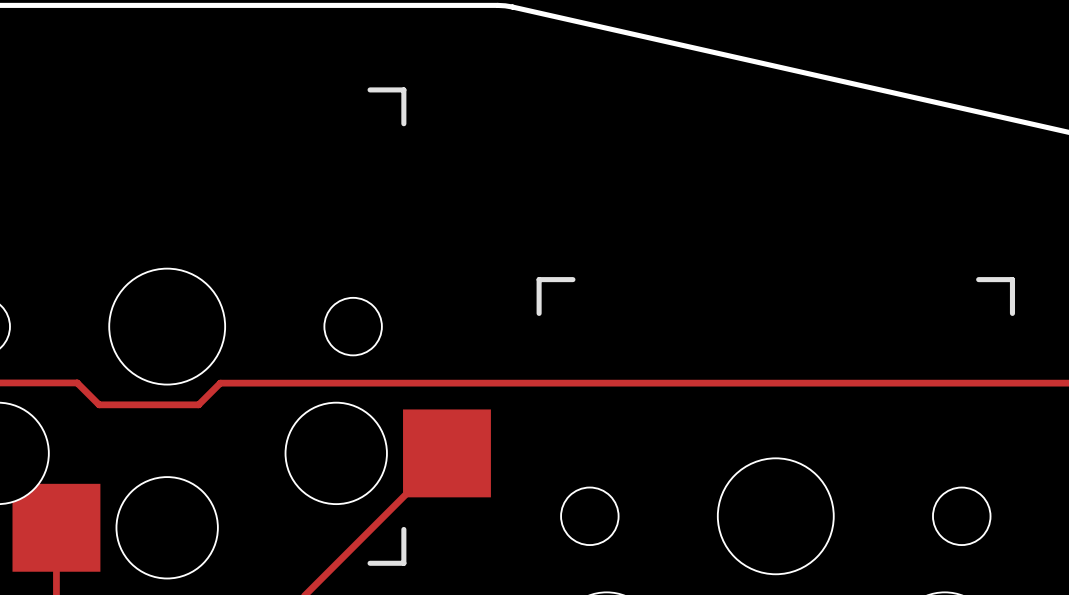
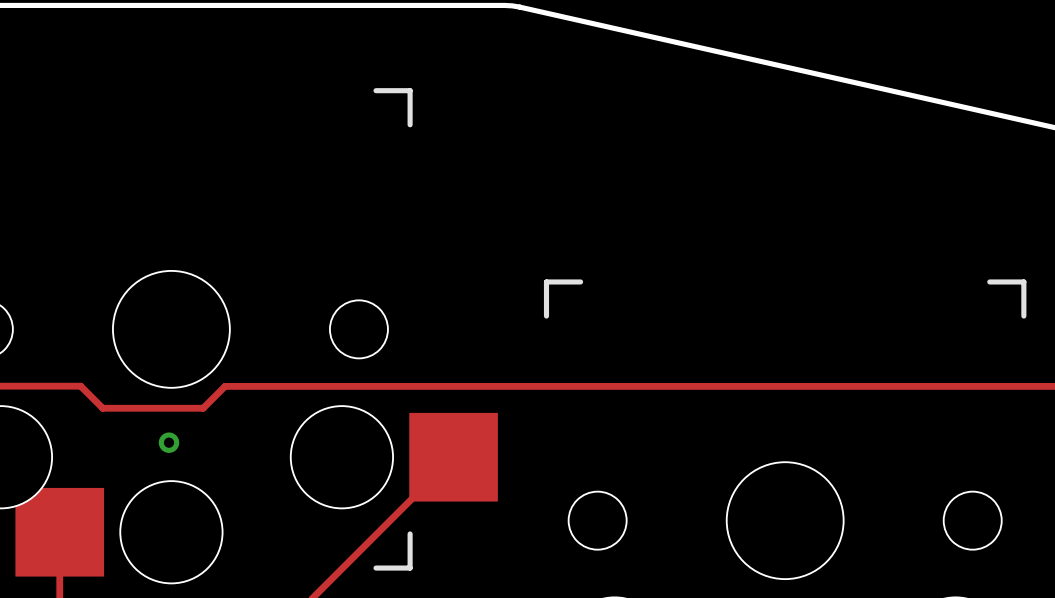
via: none -> (169, 442)

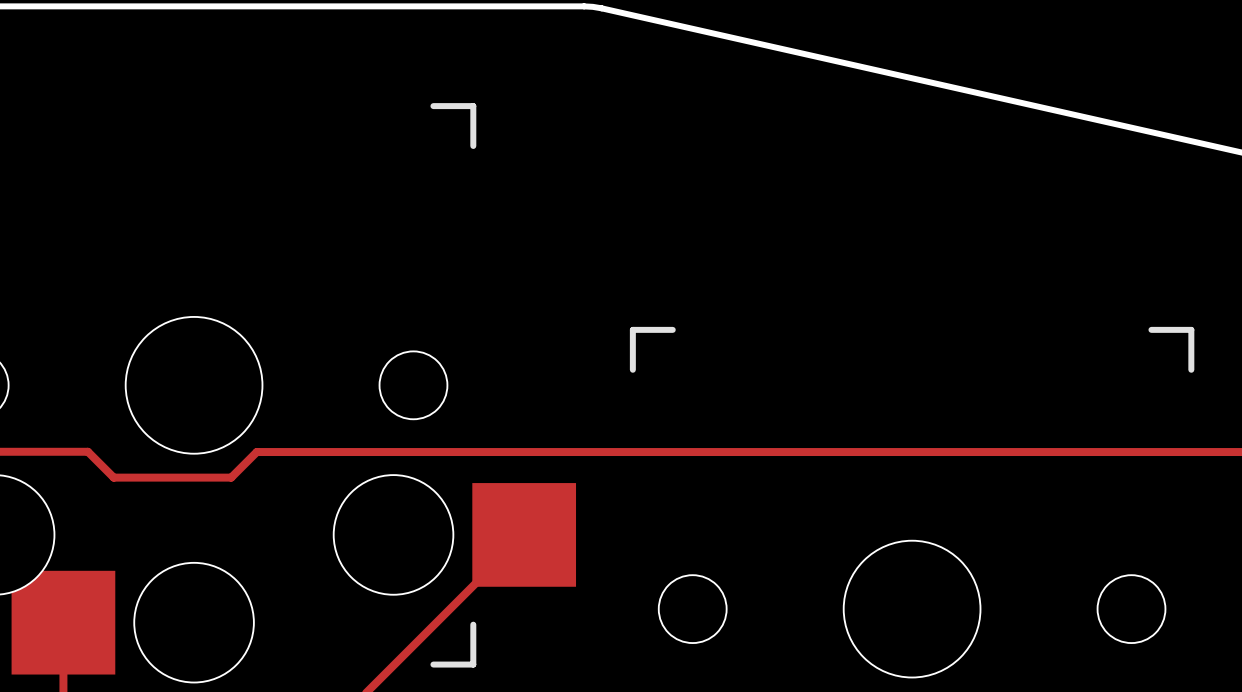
via: (169, 442) -> none

